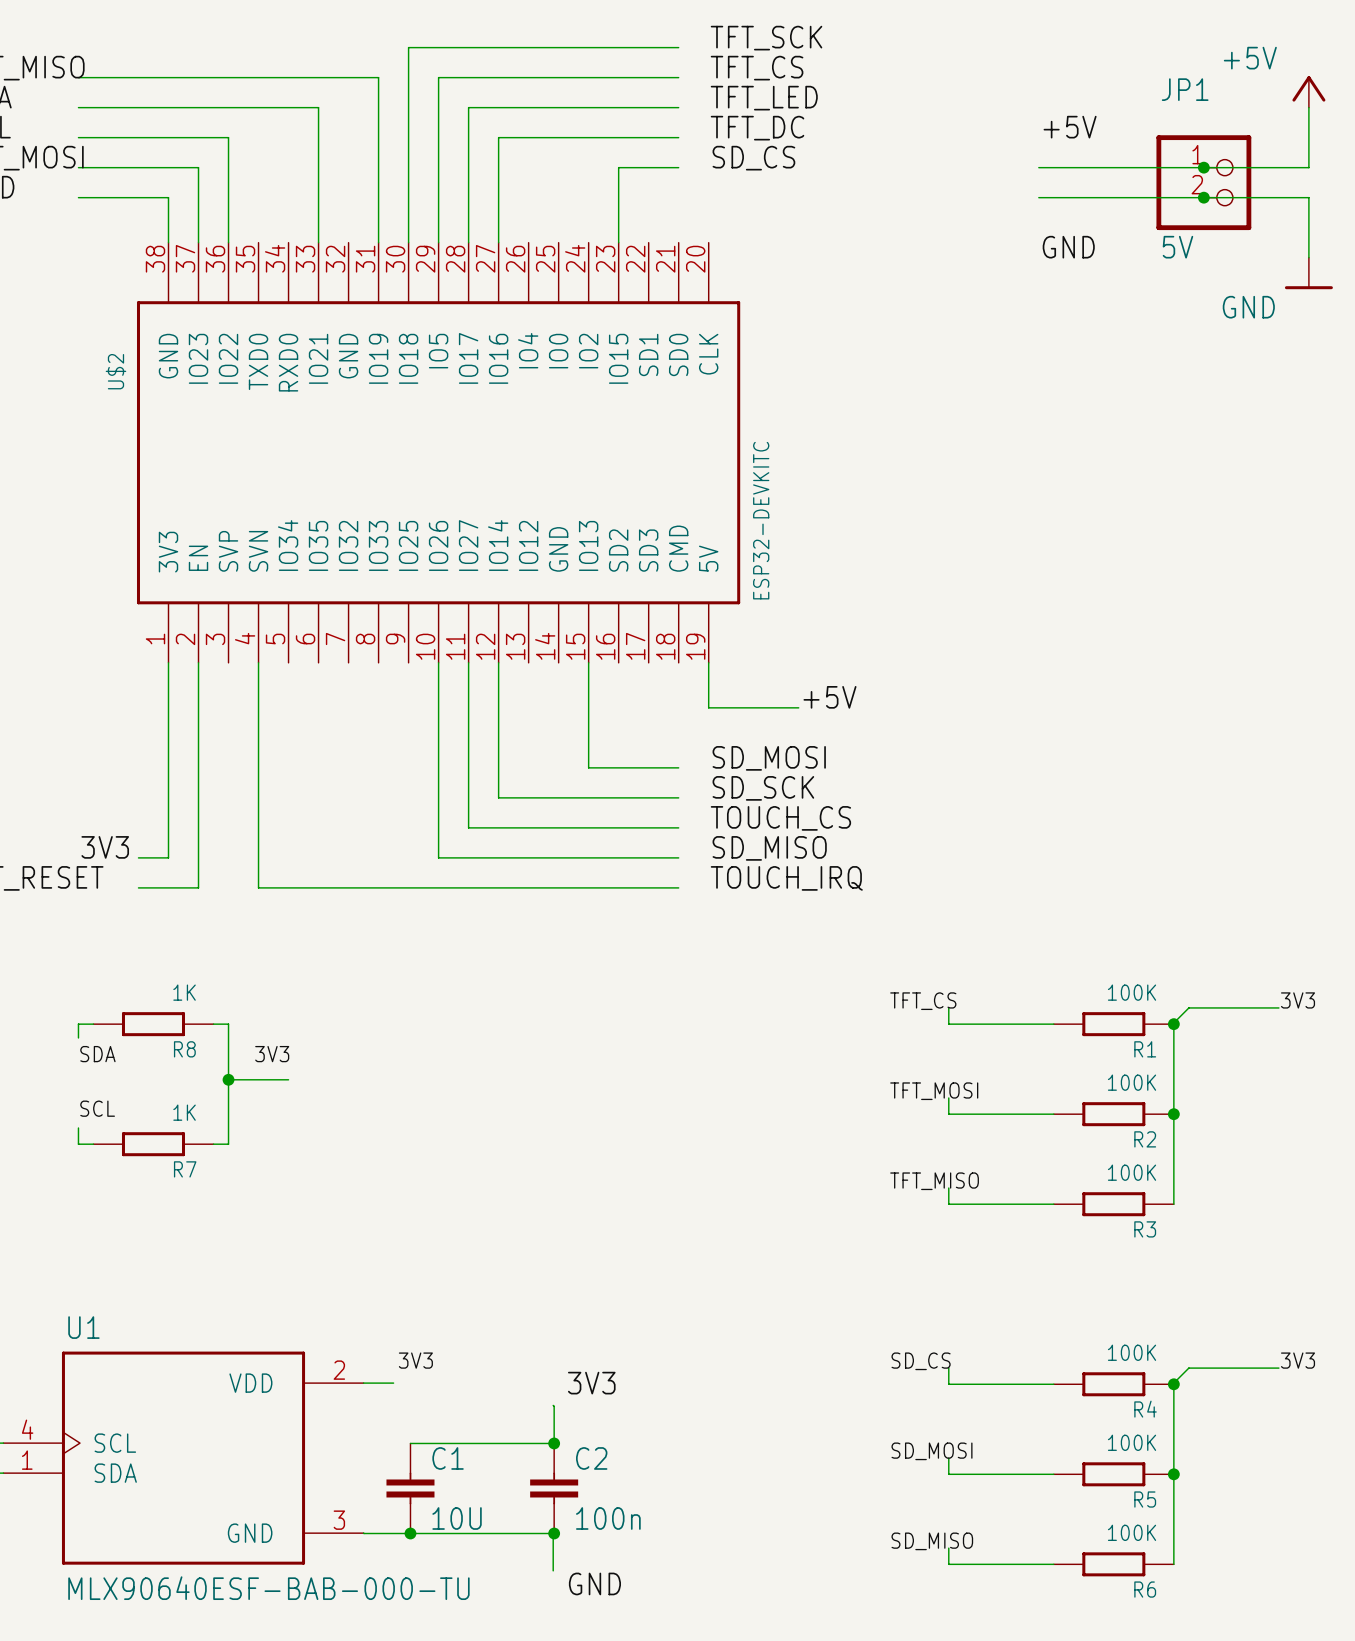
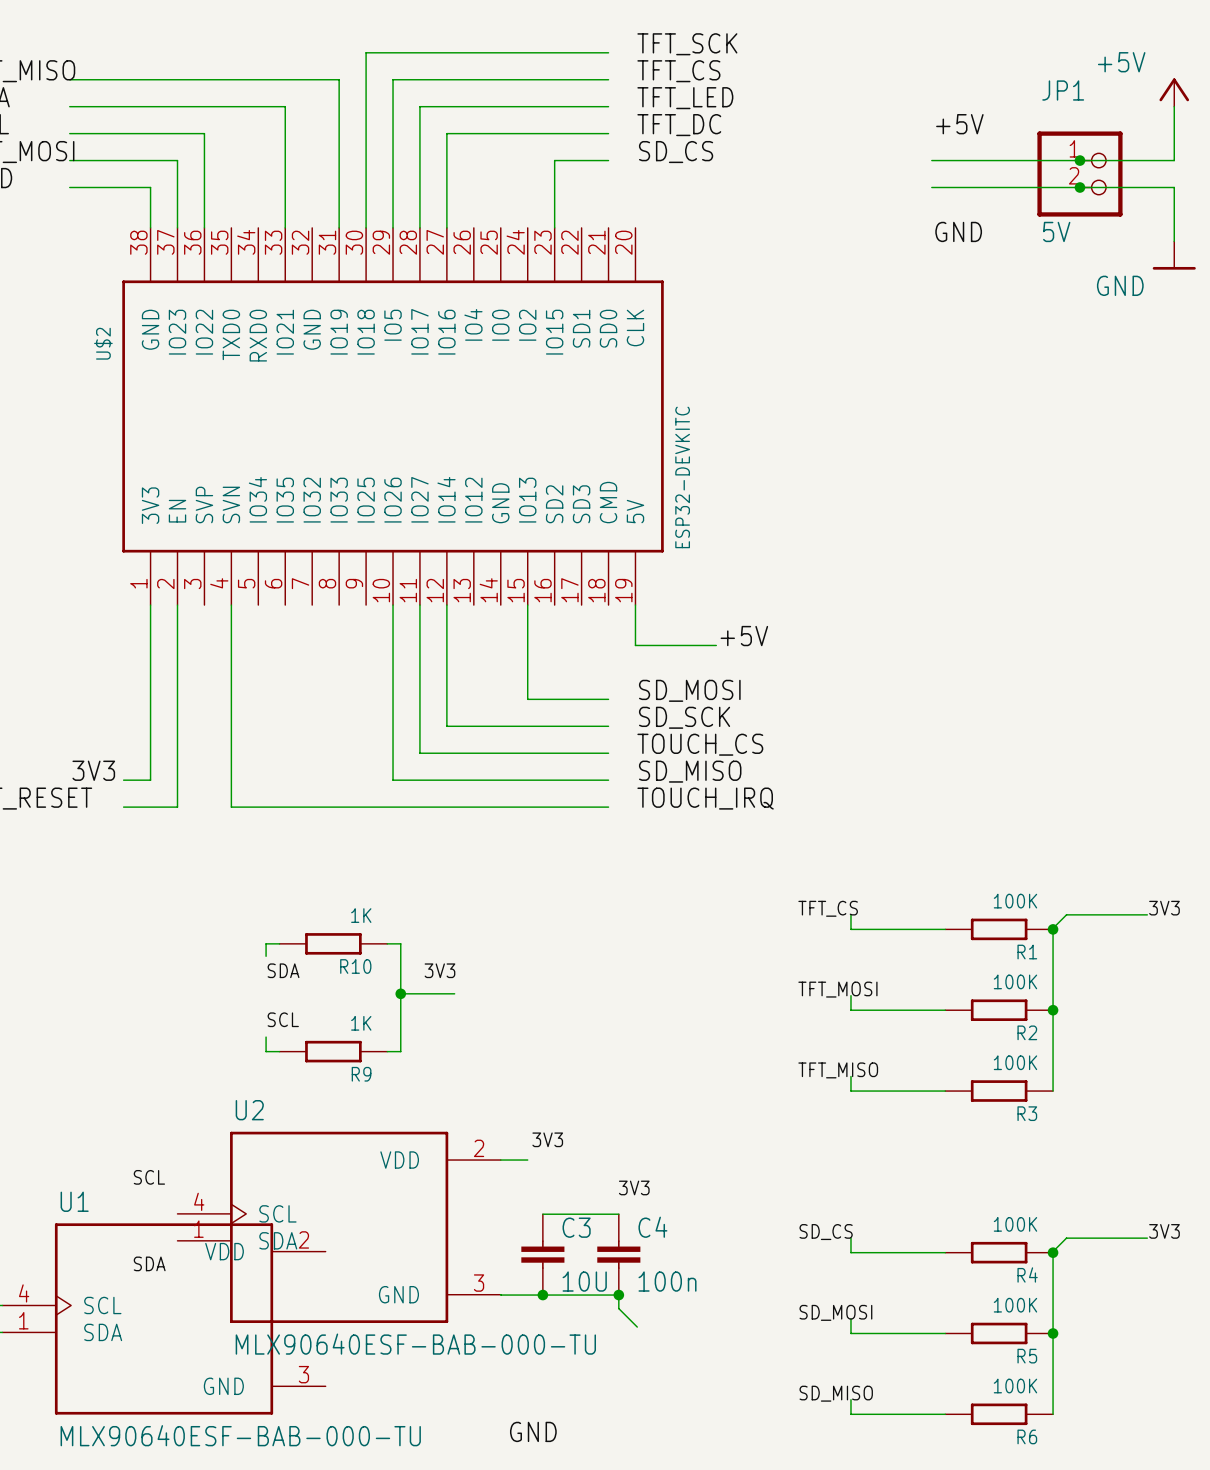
wire: (93, 1024) (78, 1024) (78, 1037) -> (279, 943) (266, 943) (266, 956)
R8: 1K (153, 1024) -> none
wire: (213, 1024) (228, 1024) (228, 1144) (213, 1144) -> (387, 943) (400, 943) (400, 1051) (387, 1051)
R10: none -> 1K (333, 943)
label: SDA (97, 1054) -> none
label: 3V3 (272, 1054) -> none
label: none -> SDA (283, 970)
label: none -> 3V3 (439, 970)
wire: (228, 1079) (288, 1079) -> (400, 993) (454, 993)
junction: (228, 1079) -> none
junction: none -> (400, 993)
label: SCL (97, 1108) -> none
label: none -> SCL (283, 1019)
wire: (78, 1128) (78, 1144) (93, 1144) -> (266, 1037) (266, 1051) (279, 1051)
R7: 1K (153, 1144) -> none
R9: none -> 1K (333, 1051)
label: none -> 3V3 (547, 1139)
label: none -> SCL (149, 1177)
label: none -> 3V3 (634, 1187)
wire: none -> (542, 1214) (618, 1214)
U2: none -> MLX90640ESF-BAB-000-TU (339, 1227)
label: 3V3 (415, 1360) -> none
wire: (363, 1383) (393, 1383) -> (500, 1160) (527, 1160)
label: 3V3 (591, 1383) -> none
C3: none -> 10U (542, 1254)
C4: none -> 100n (618, 1254)
label: none -> SDA (149, 1263)
wire: (553, 1405) (554, 1443) (410, 1443) -> none
wire: none -> (500, 1294) (618, 1295) (618, 1308) (637, 1327)
junction: none -> (618, 1295)
junction position: (554, 1443) -> (542, 1295)
C1: 10U (410, 1488) -> none
C2: 100n (554, 1488) -> none
wire: (363, 1533) (554, 1533) (553, 1570) -> none
junction: (410, 1533) -> none
junction: (554, 1533) -> none

